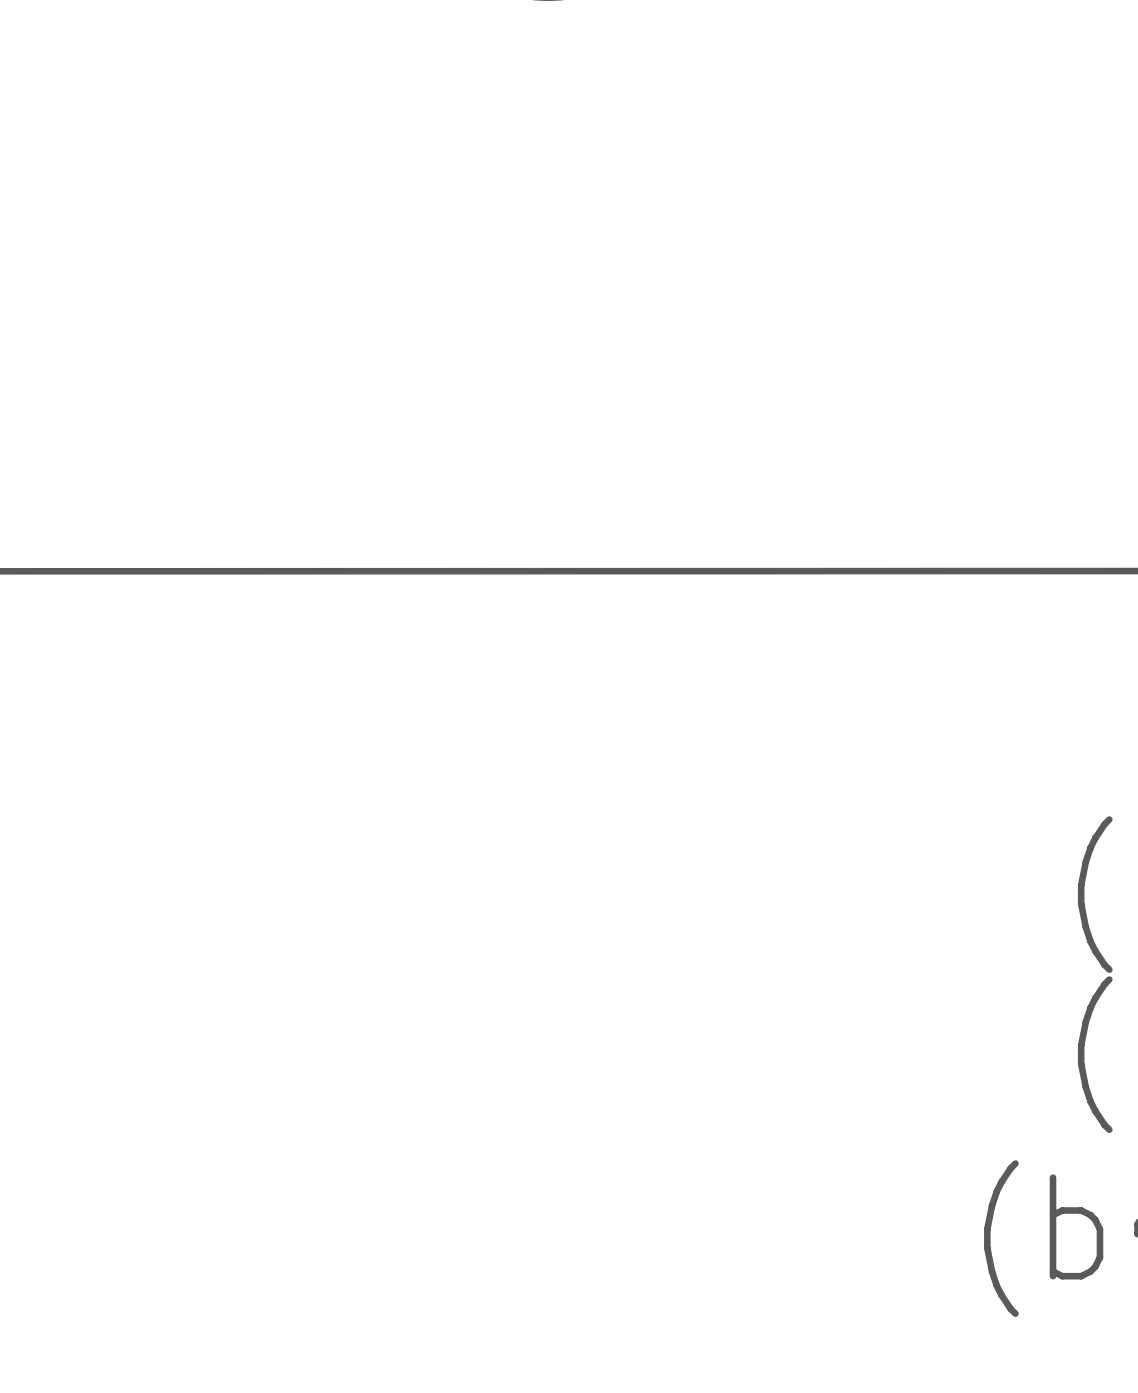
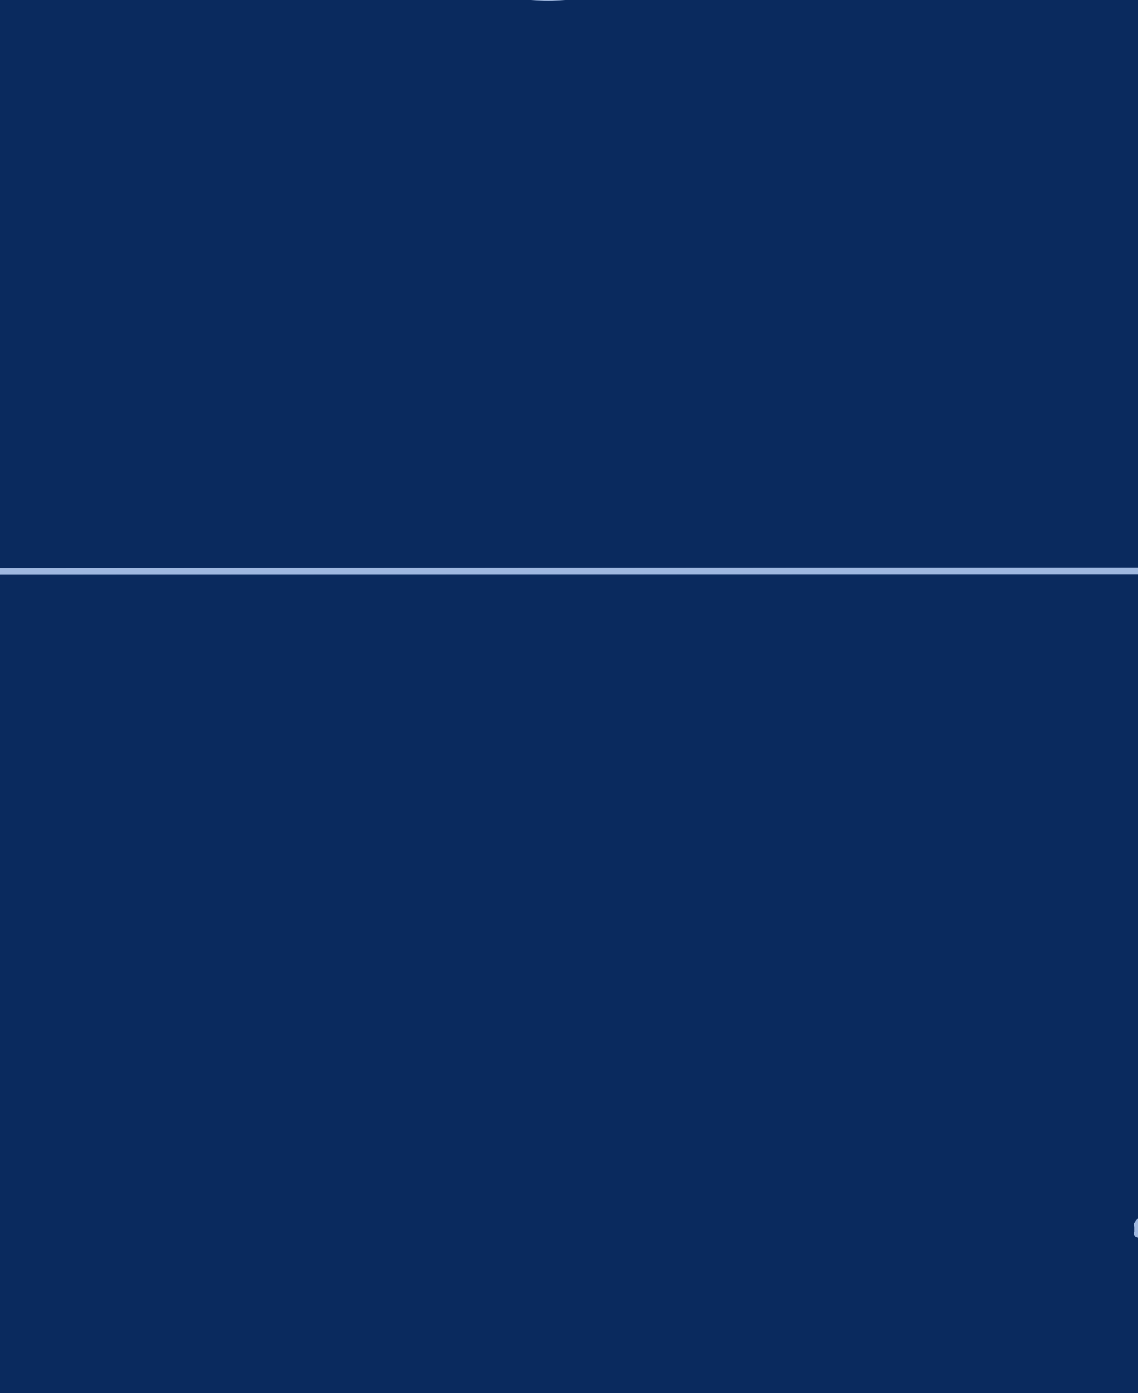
line: (1109, 819) (1090, 847) (1081, 885) (1081, 903) (1085, 927) (1095, 950) (1109, 969) -> none
line: (1109, 979) (1090, 1007) (1081, 1045) (1081, 1064) (1085, 1087) (1095, 1110) (1109, 1129) -> none
line: (1015, 1163) (996, 1191) (987, 1229) (987, 1248) (992, 1271) (1001, 1294) (1015, 1313) -> none
line: (1053, 1177) (1053, 1276) -> none
line: (1053, 1215) (1062, 1210) (1081, 1210) (1090, 1215) (1099, 1229) (1099, 1257) (1090, 1271) (1081, 1276) (1062, 1276) (1053, 1271) -> none

